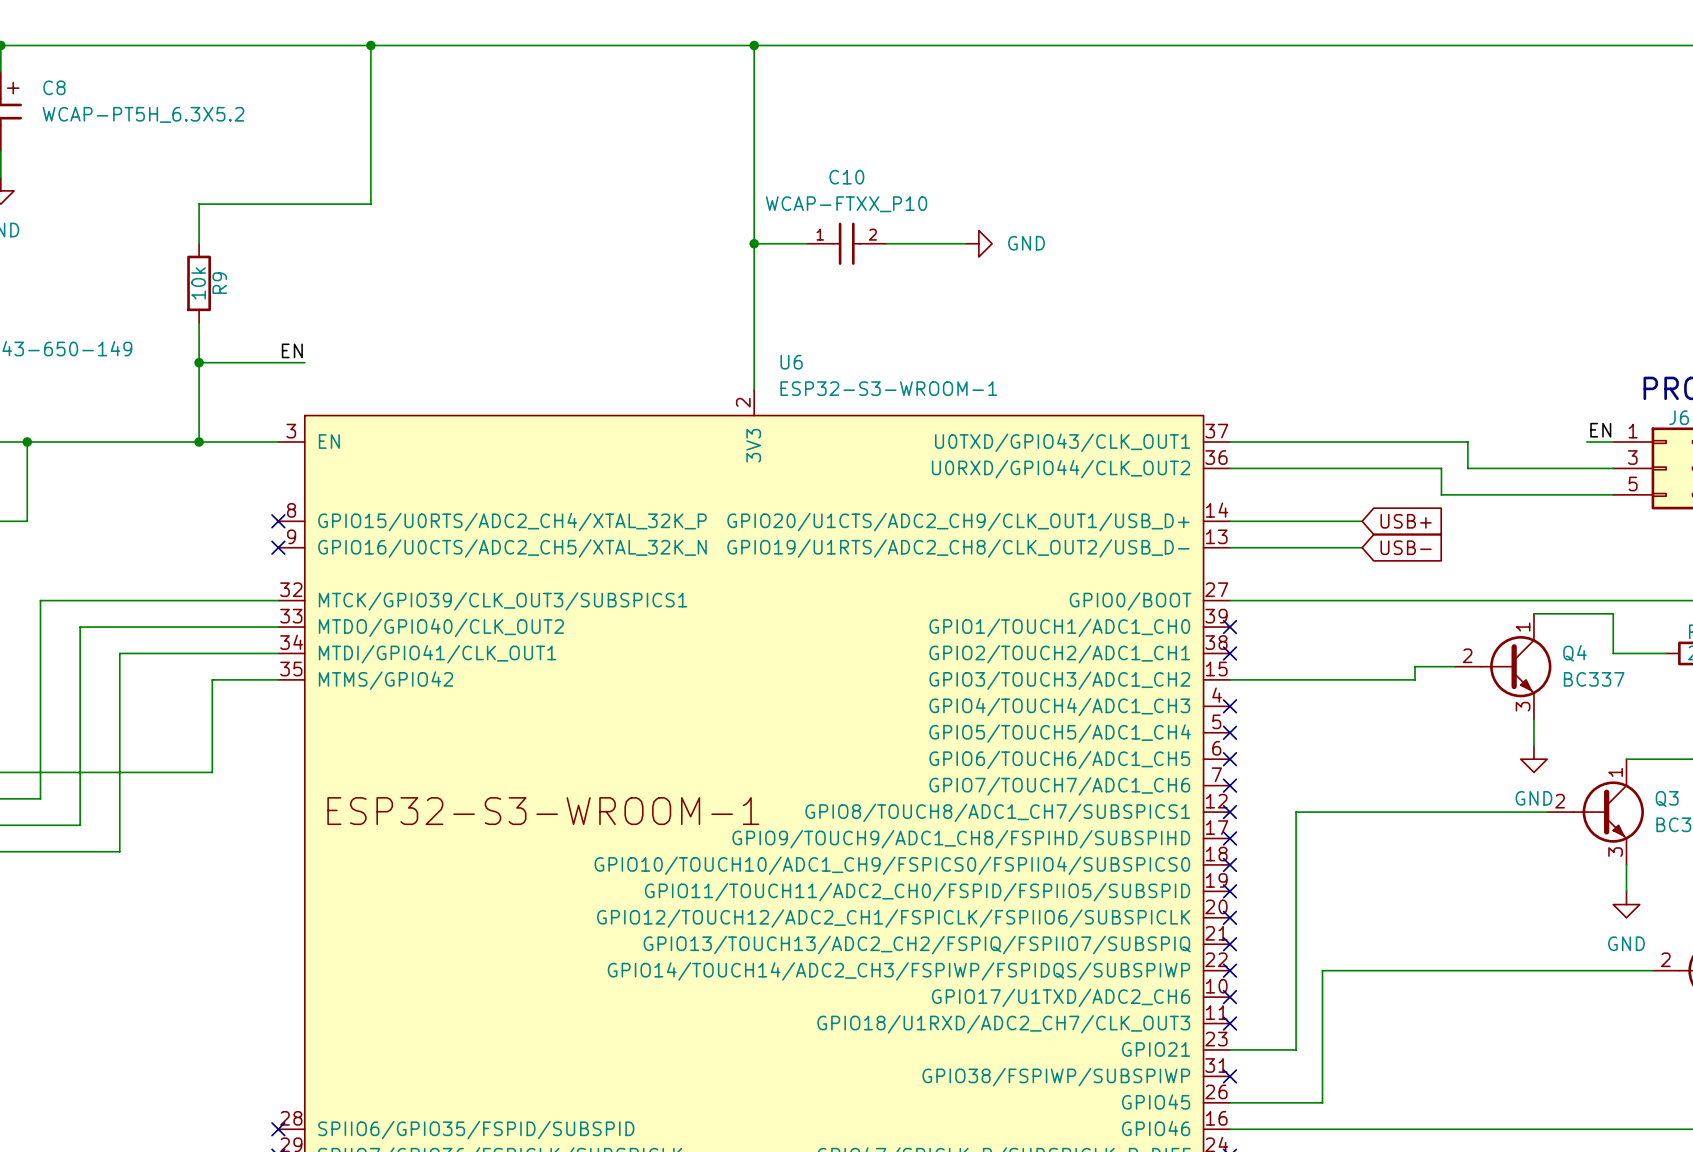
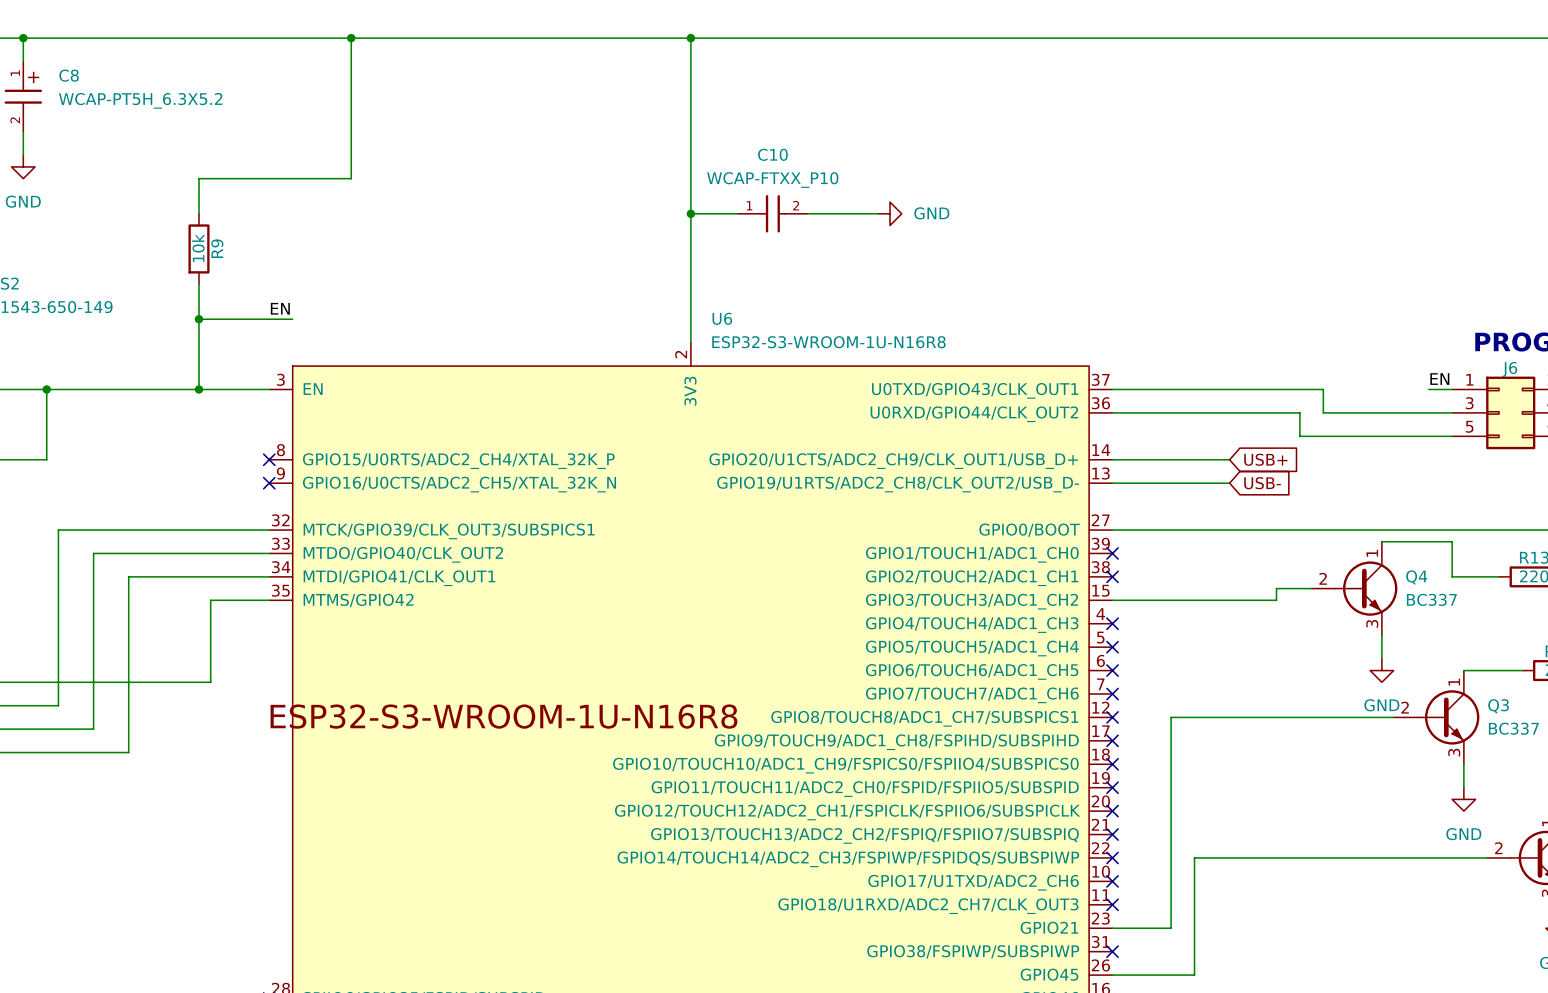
U6 value: ESP32-S3-WROOM-1 (888, 388) -> ESP32-S3-WROOM-1U-N16R8 (828, 342)
U6 text: ESP32-S3-WROOM-1 (543, 811) -> ESP32-S3-WROOM-1U-N16R8 (503, 716)

